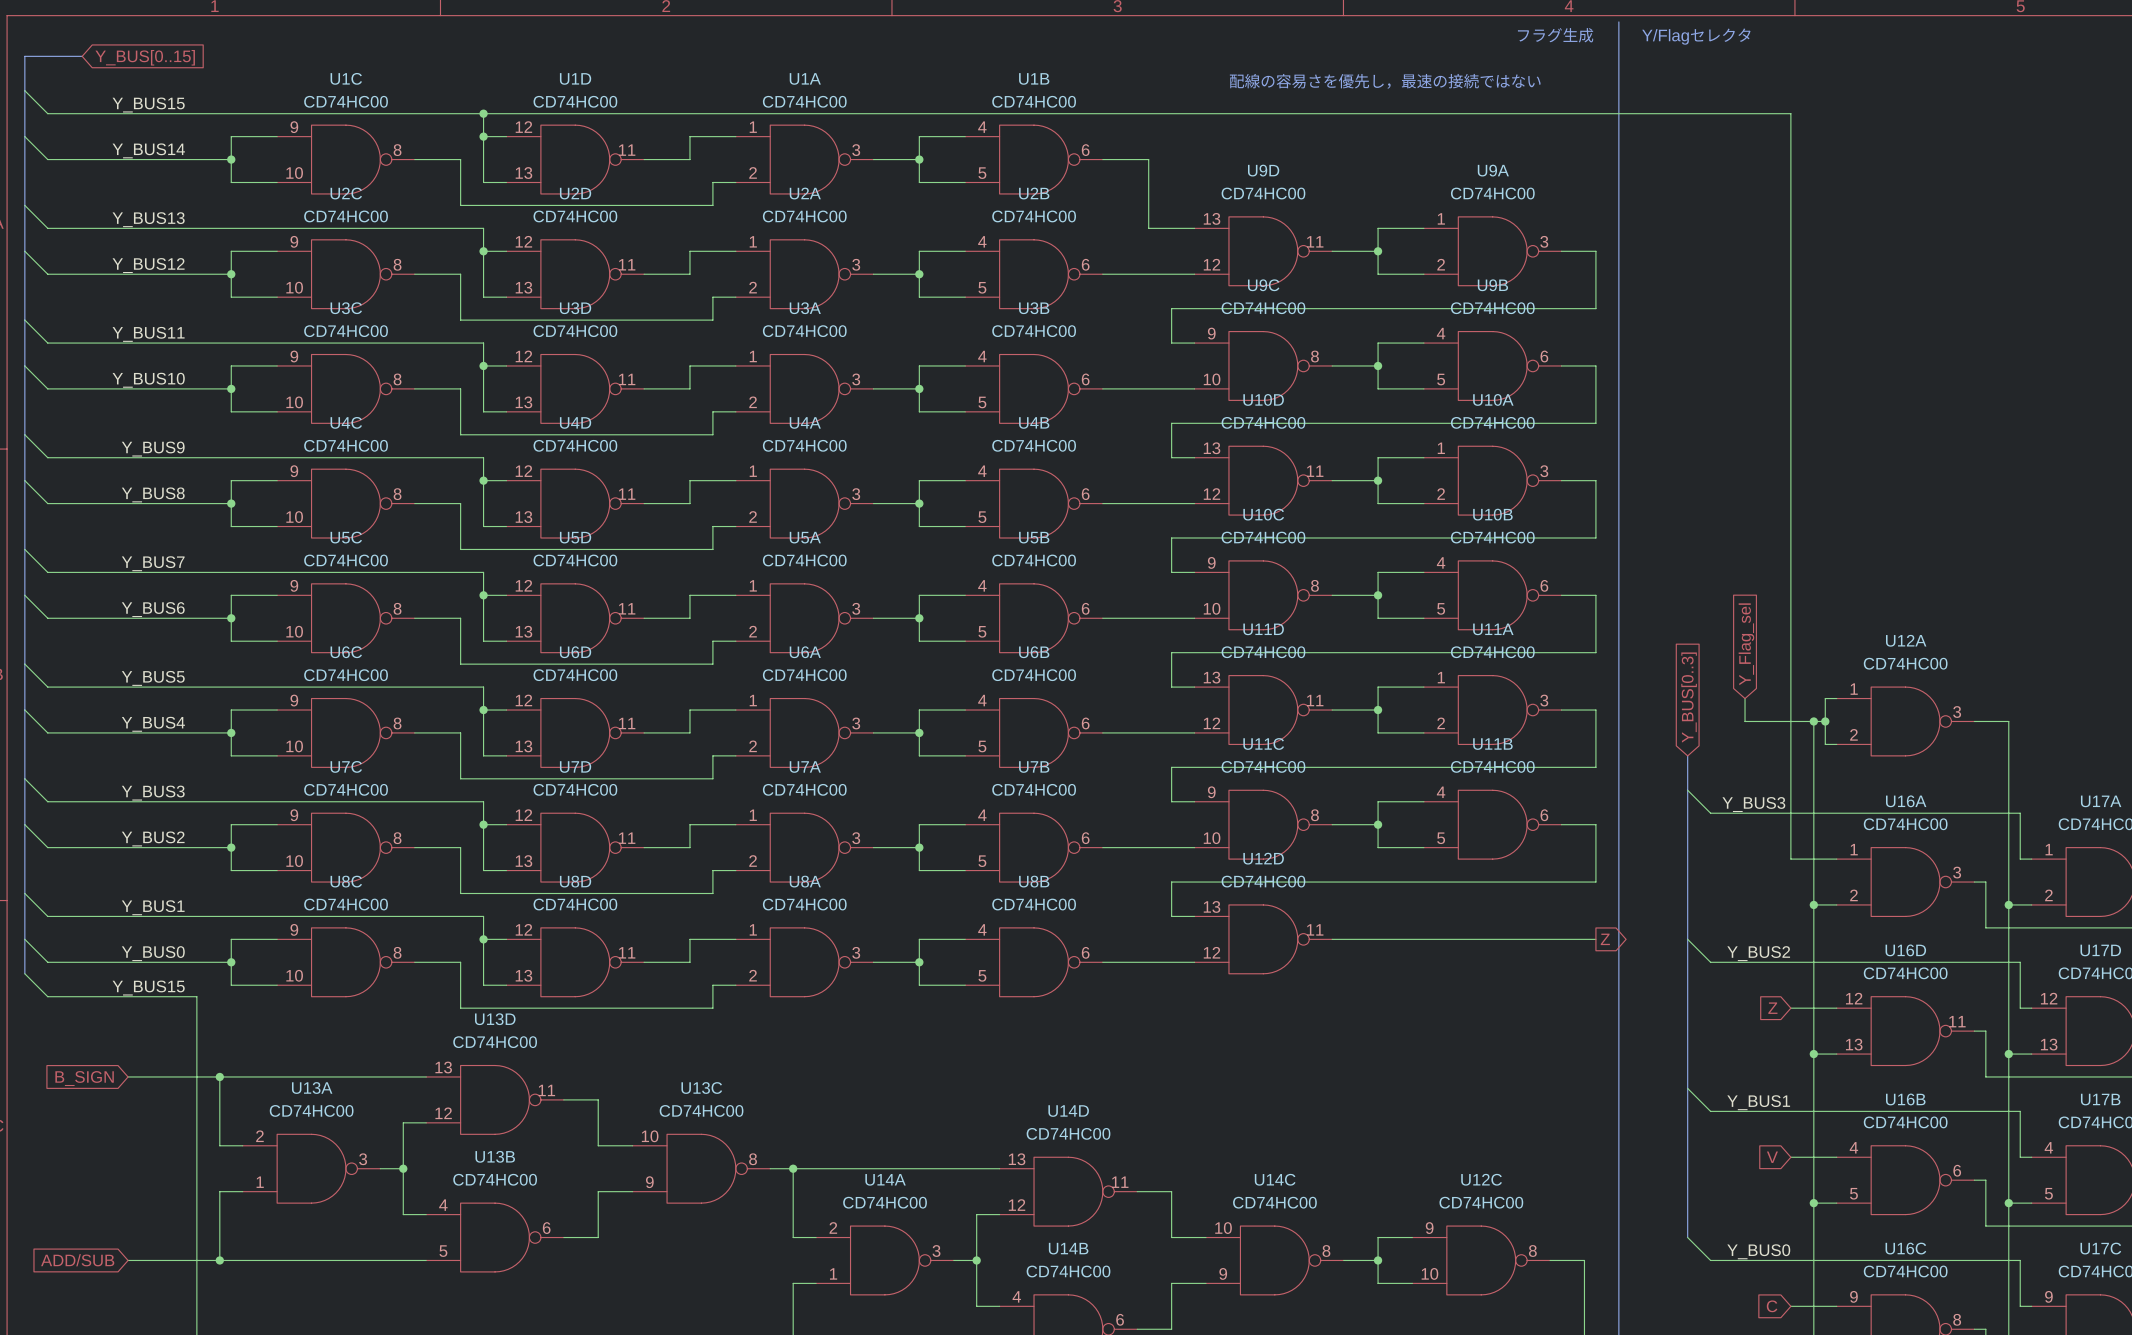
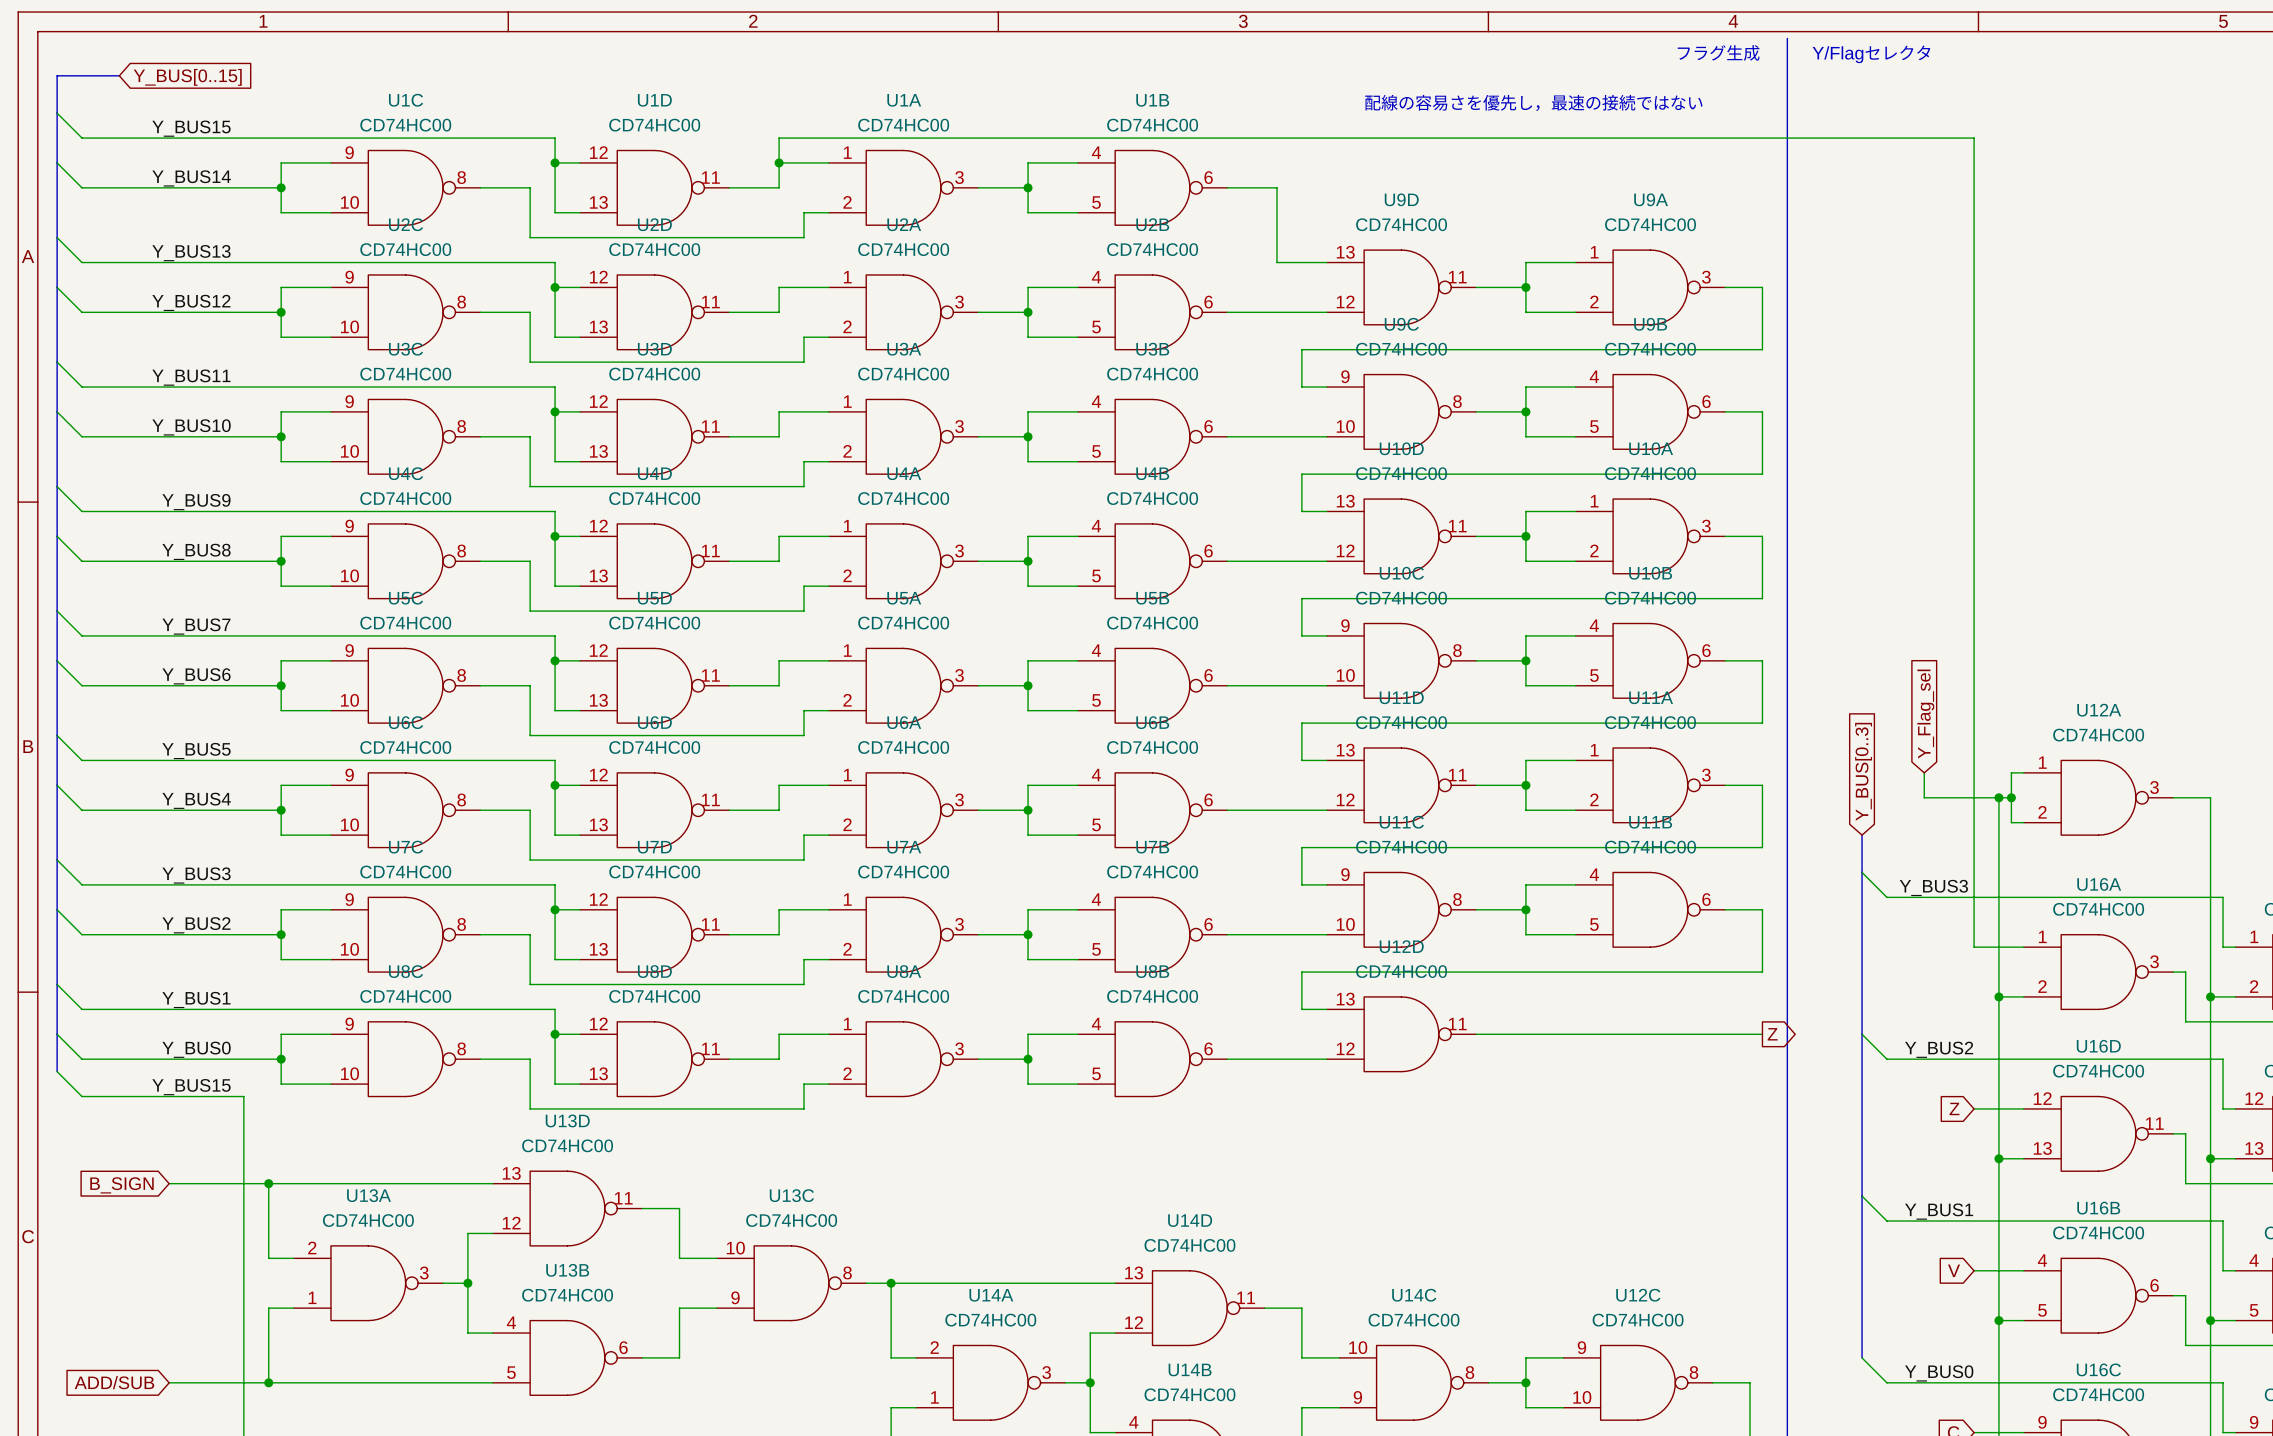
wire: (483, 113) (689, 113) -> (779, 162) (779, 138)
junction: (483, 113) -> none
junction: none -> (779, 162)

